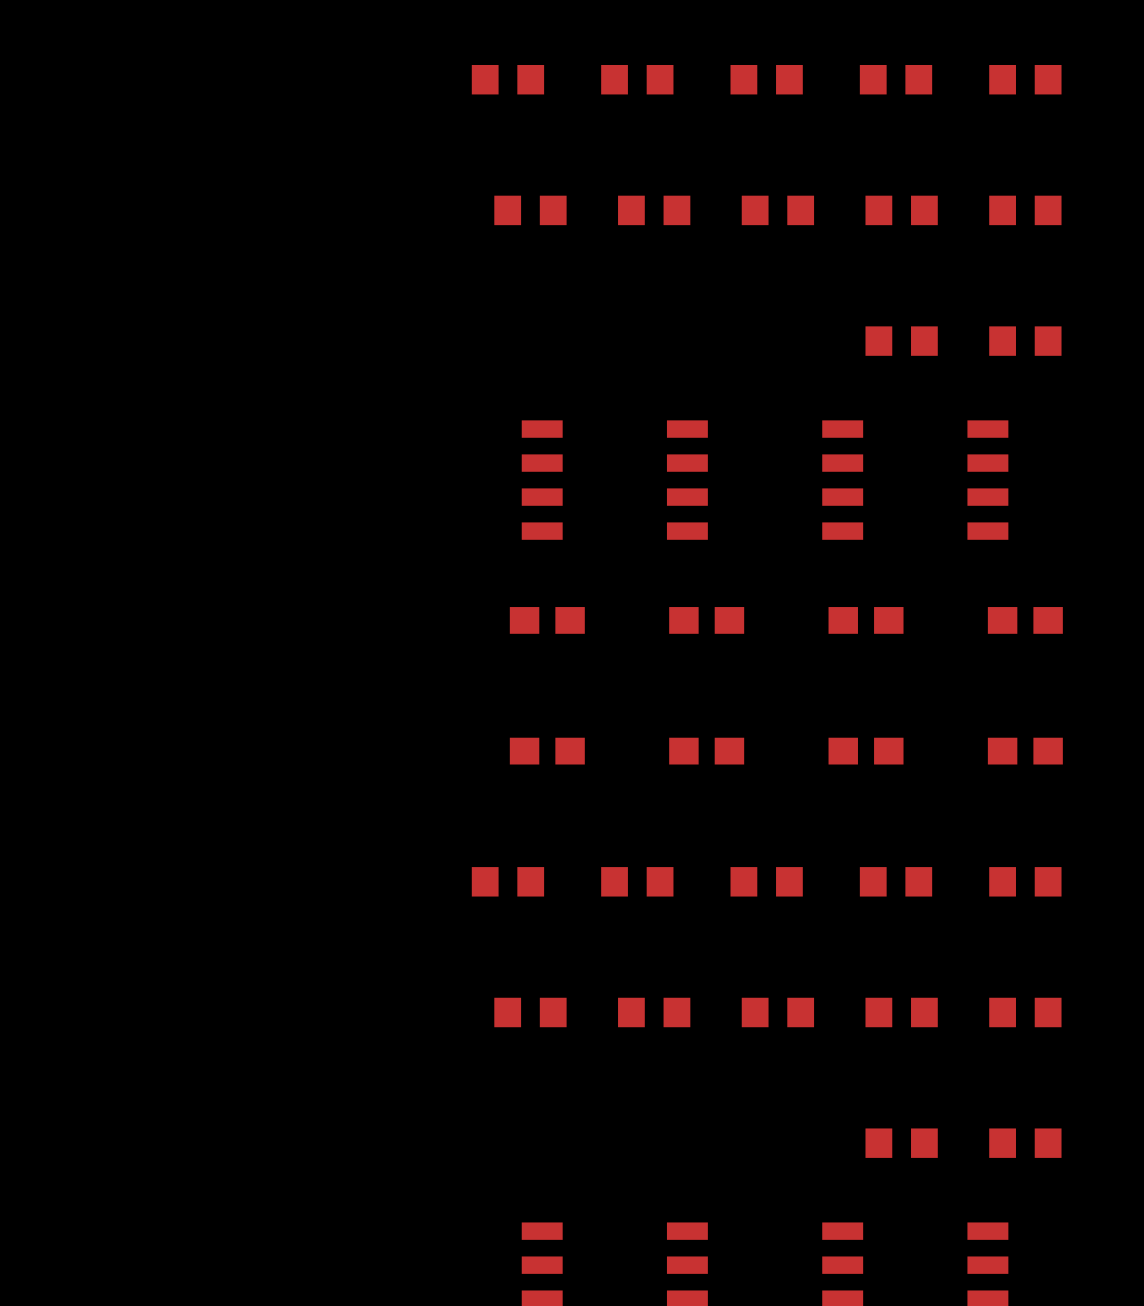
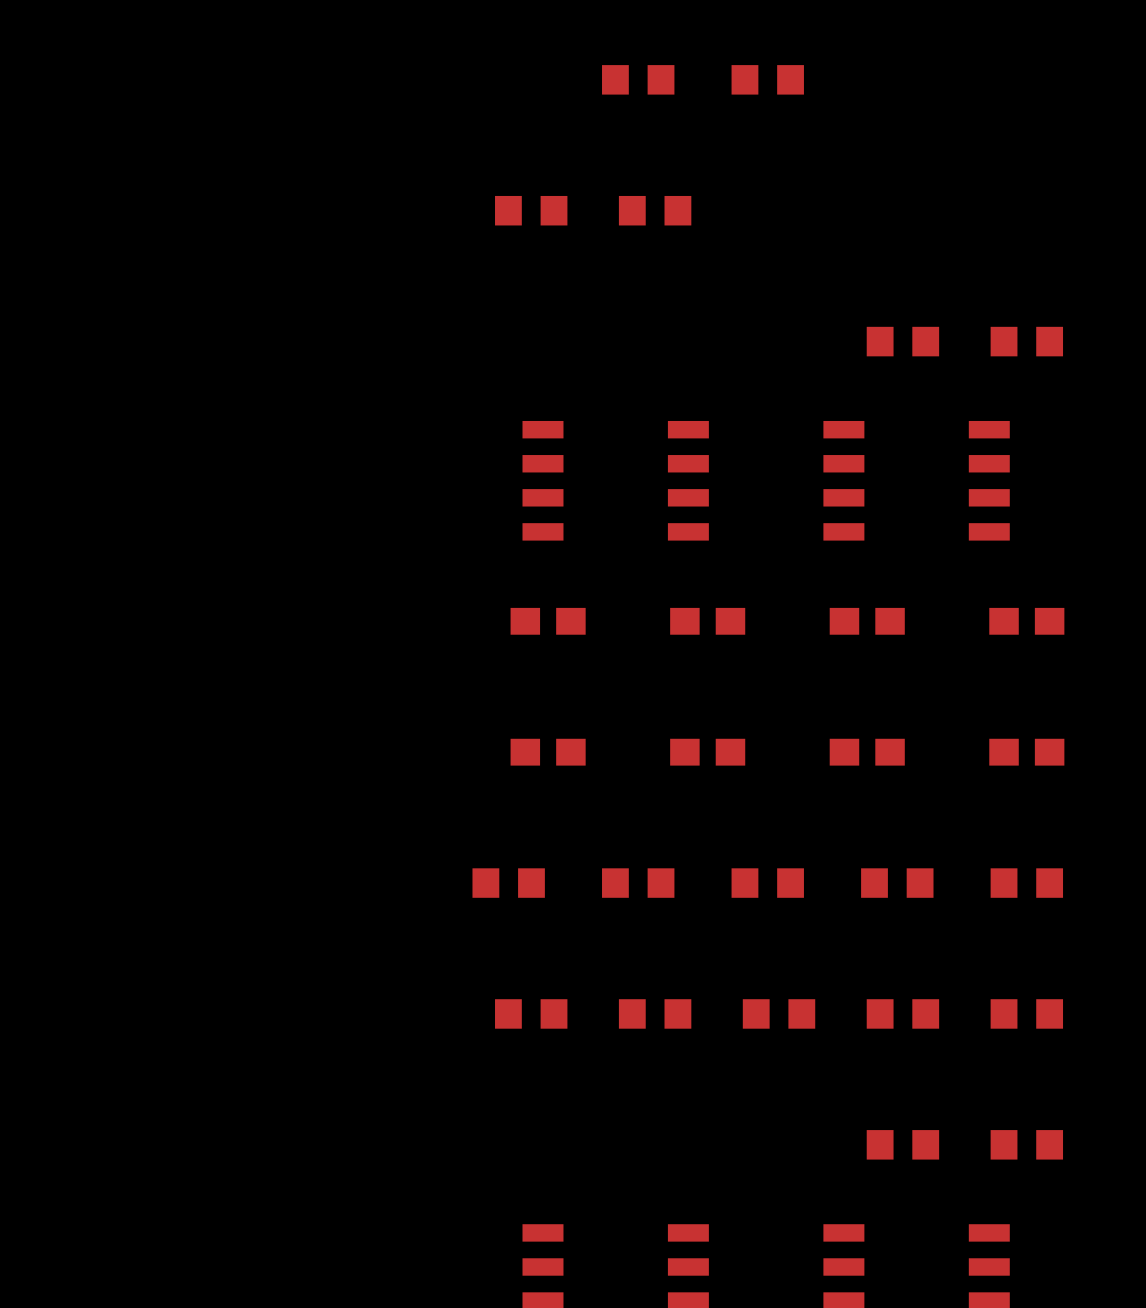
part: (507, 79) -> none
part: (896, 79) -> none
part: (1025, 79) -> none
part: (777, 210) -> none
part: (901, 210) -> none
part: (1025, 210) -> none

